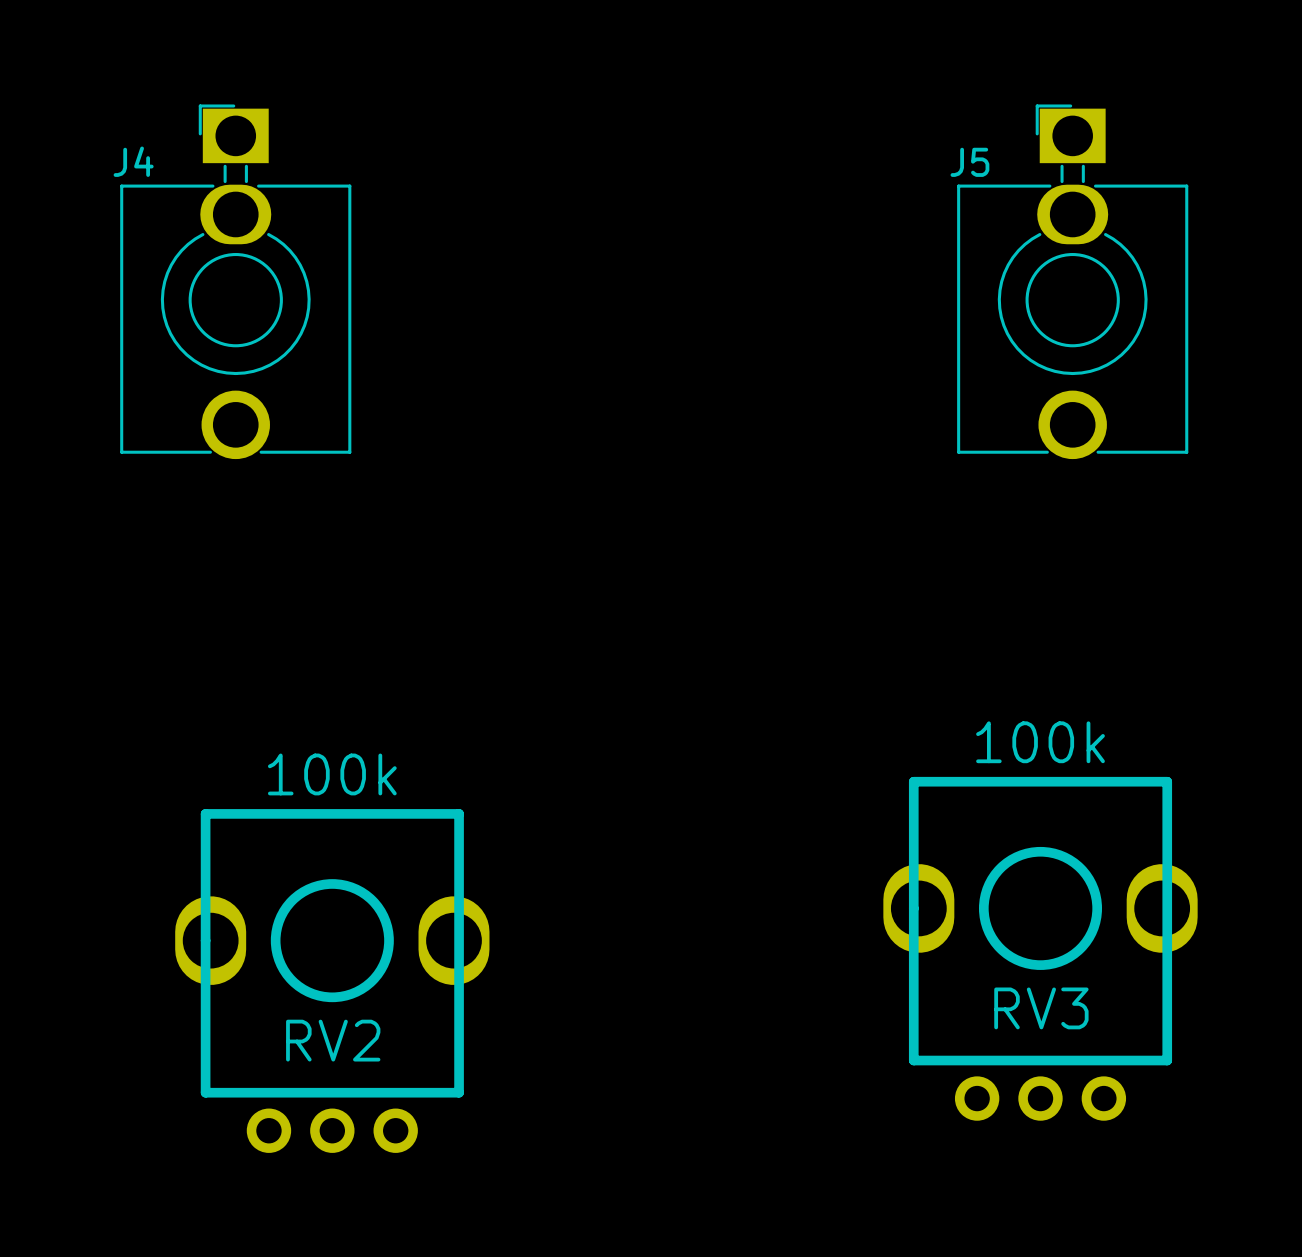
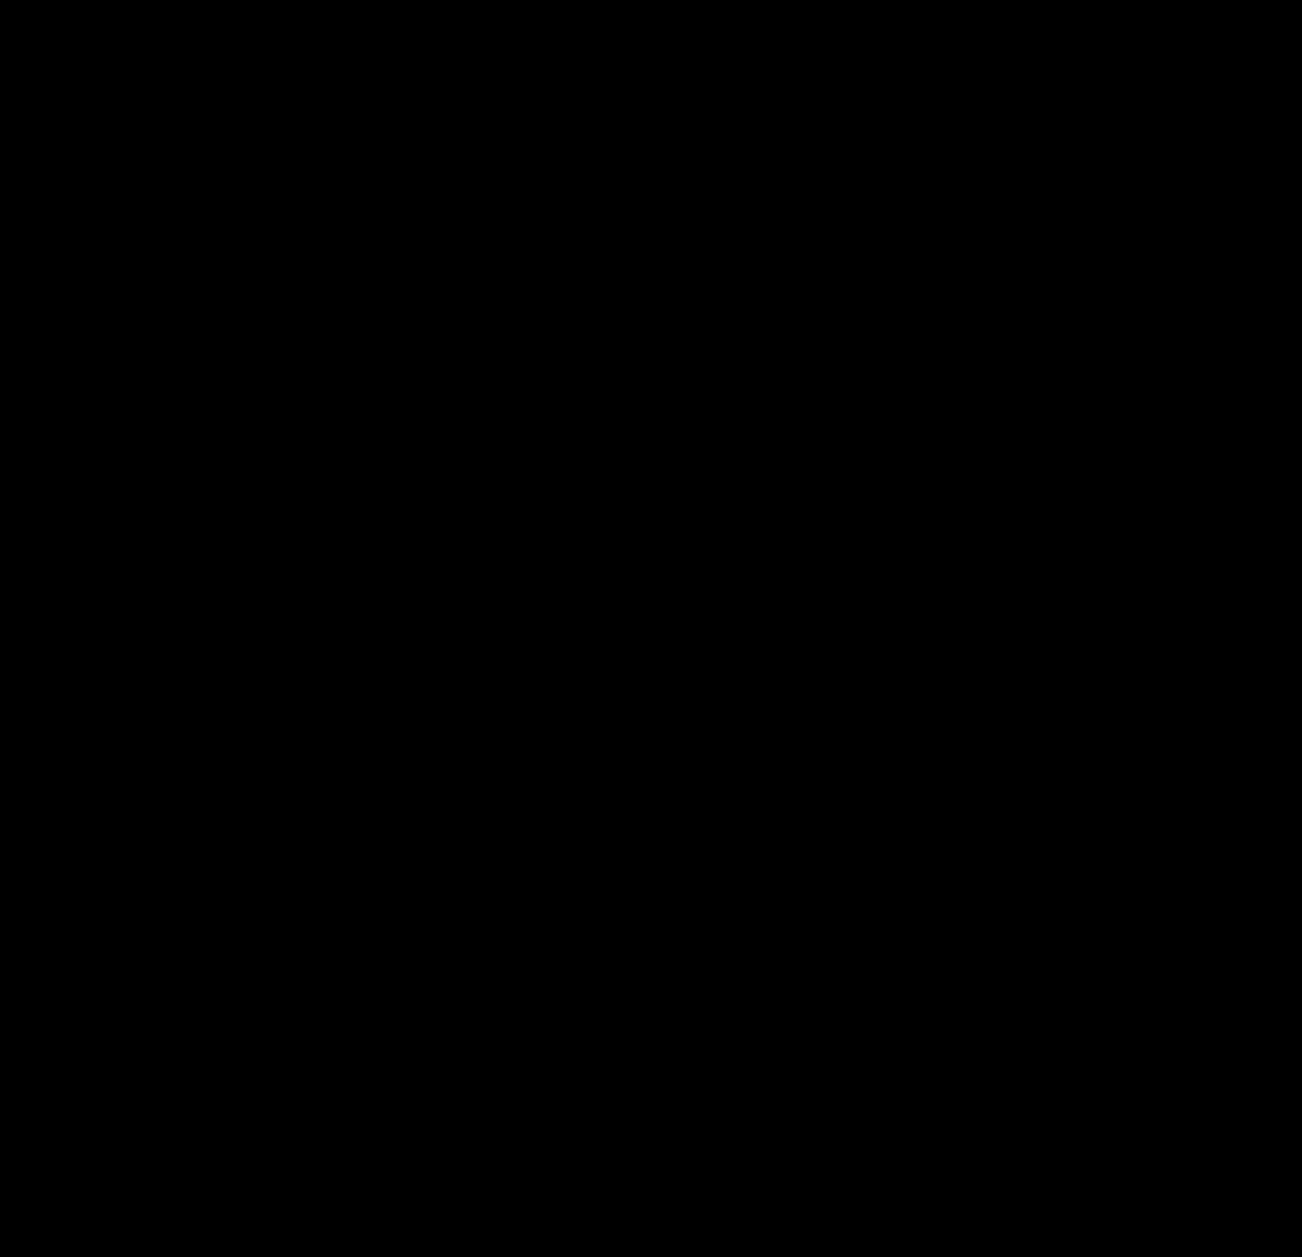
J4: (235, 281) -> none
J5: (1072, 281) -> none
RV3: 100k (1040, 948) -> none
RV2: 100k (332, 980) -> none

